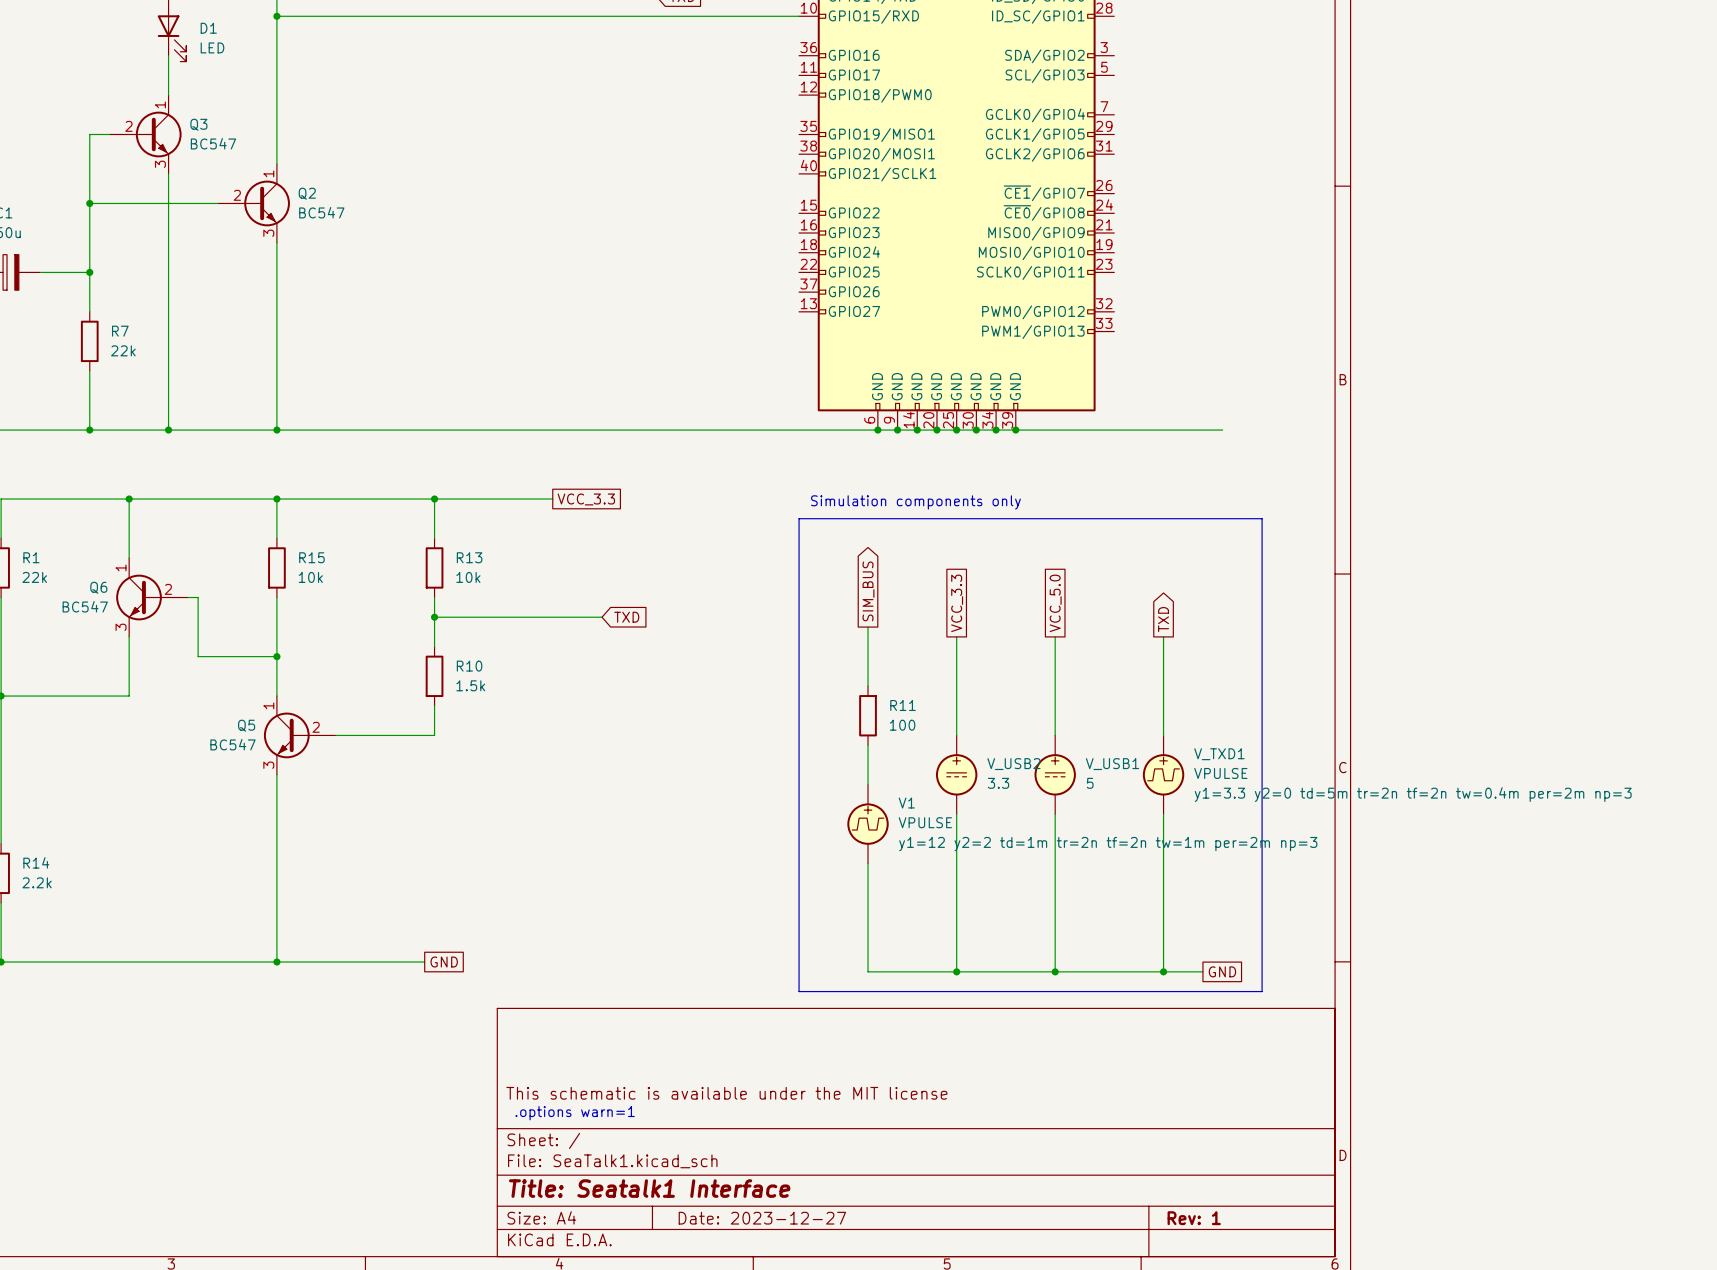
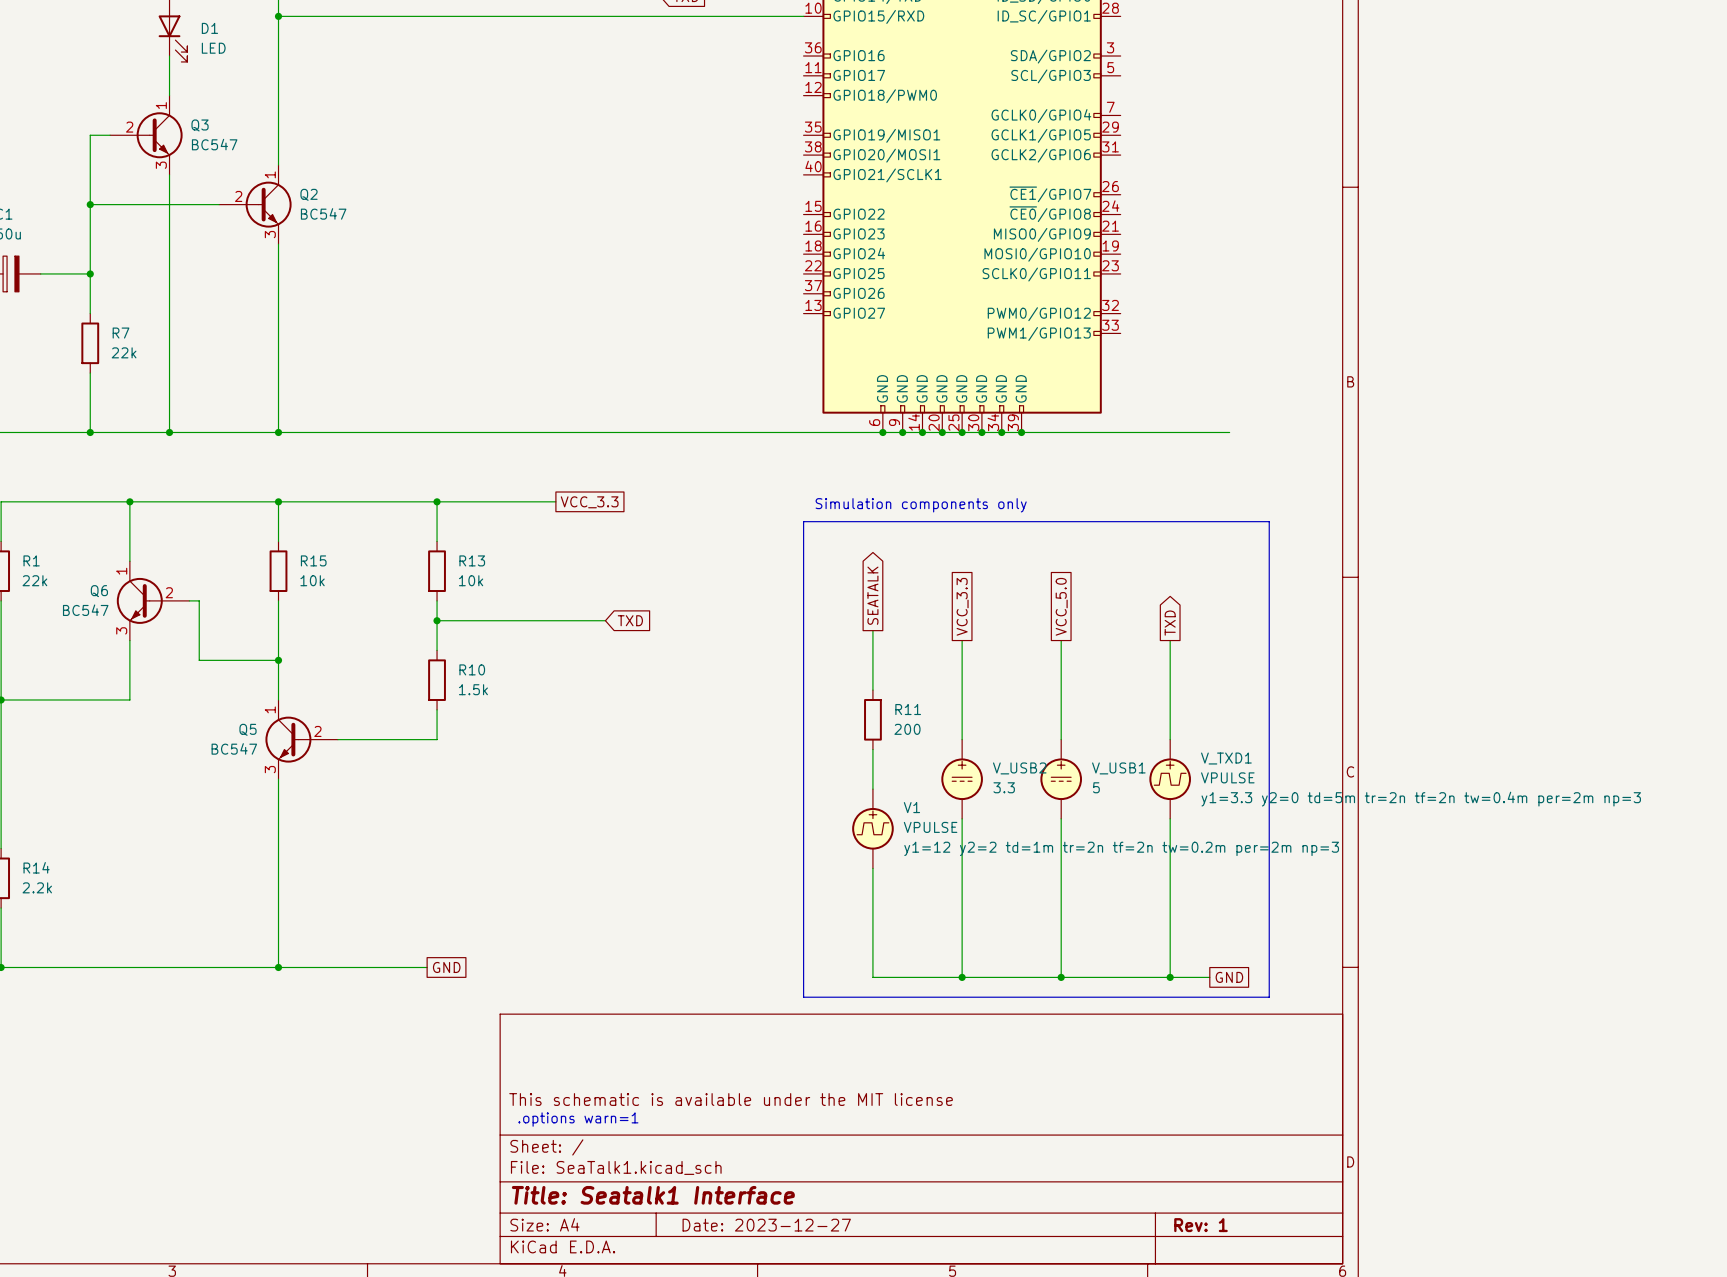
global label: SIM_BUS (868, 591) -> SEATALK (872, 595)
R11 value: 100 (902, 725) -> 200 (907, 729)
V1 text: y1=12 y2=2 td=1m tr=2n tf=2n tw=1m per=2m np=3 (1108, 844) -> y1=12 y2=2 td=1m tr=2n tf=2n tw=0.2m per=2m np=3 (1121, 848)

